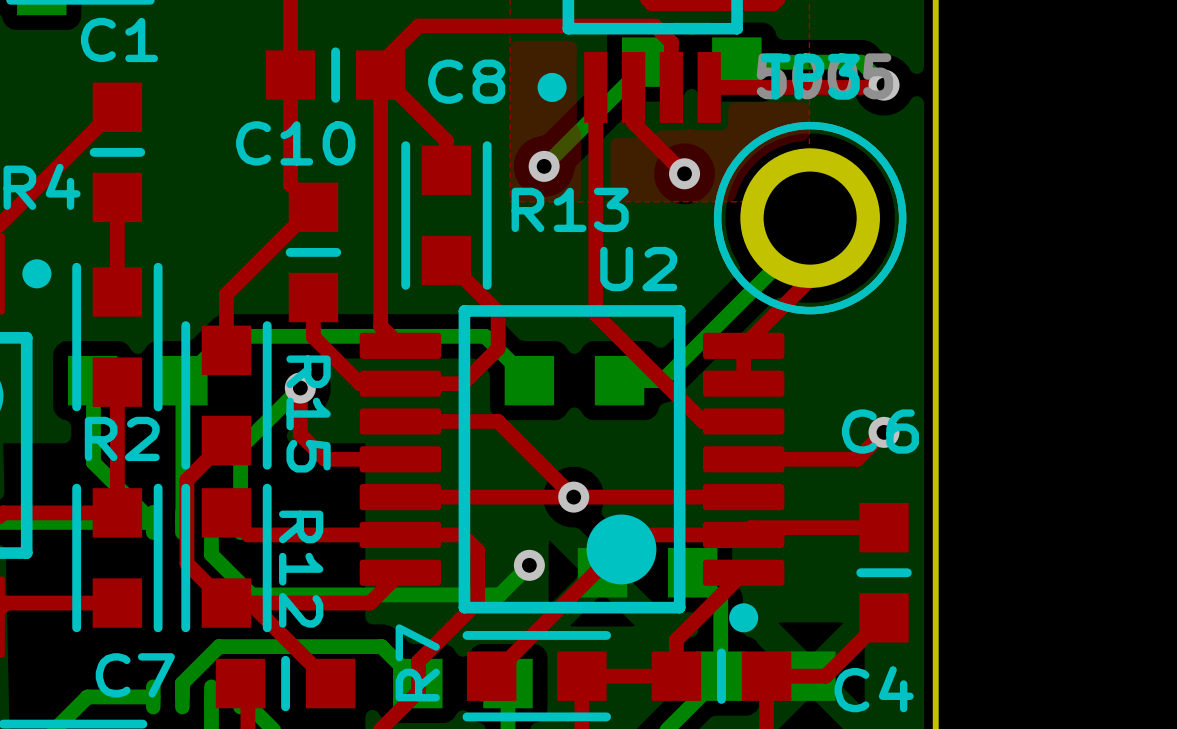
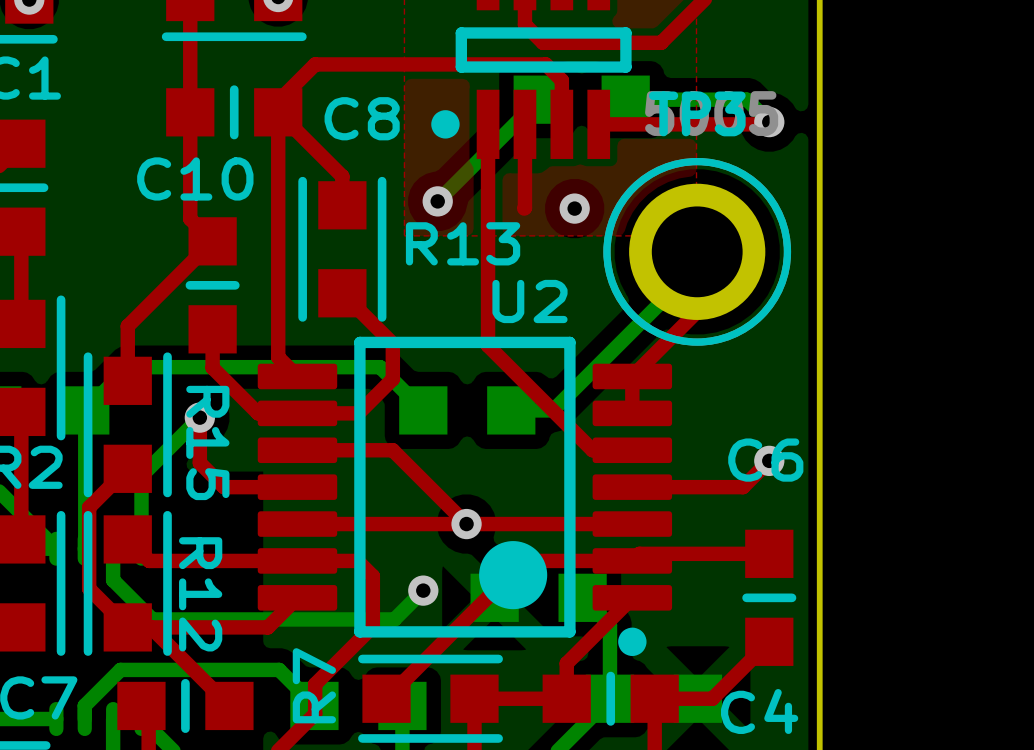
top track: (633, 122) (684, 173) -> (524, 158) (524, 207)

